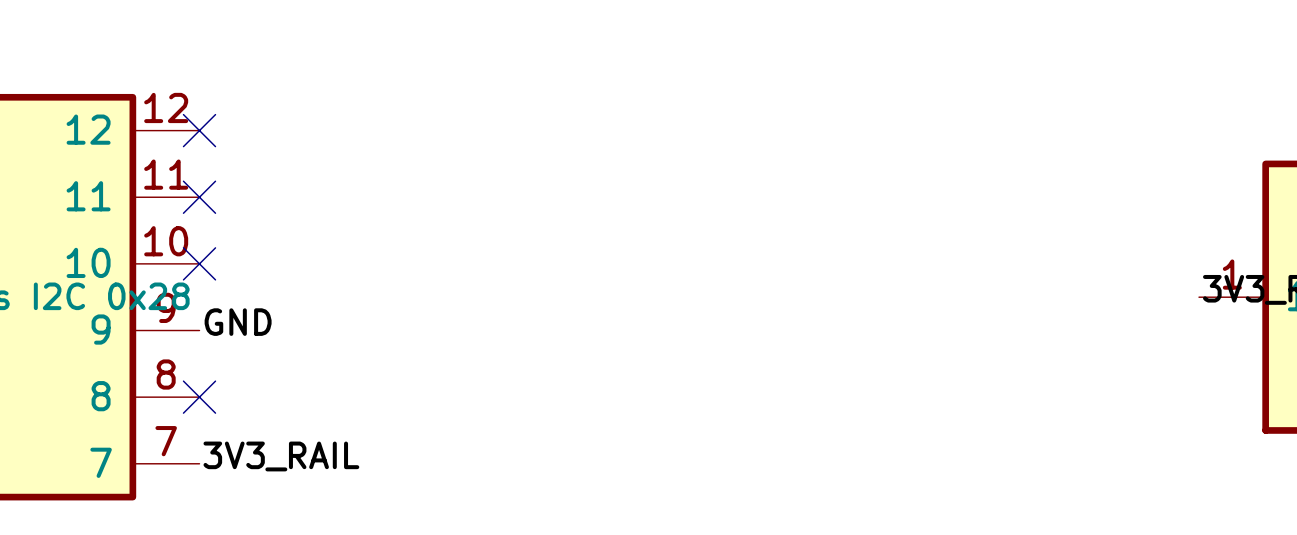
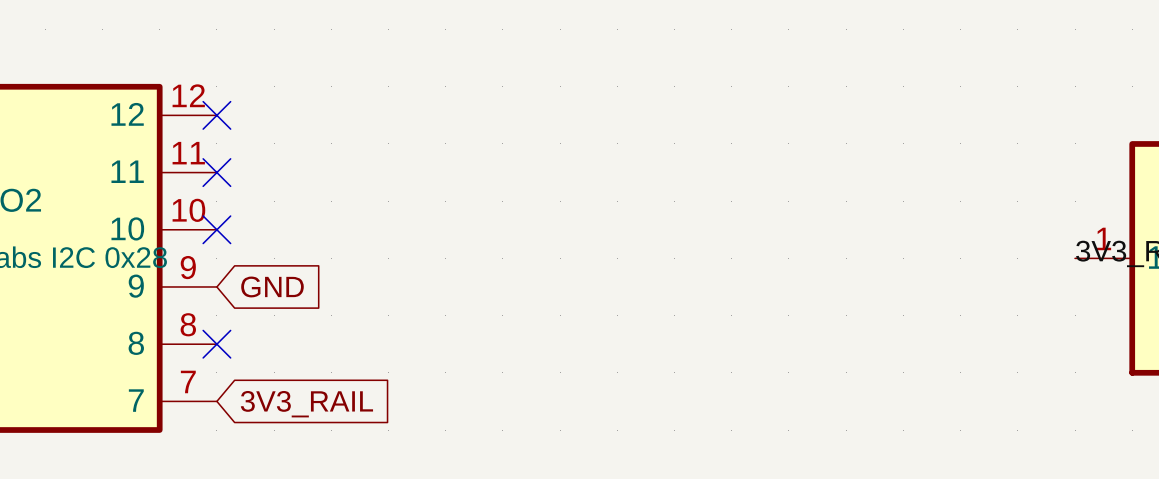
label: GND (238, 322) -> none
global label: none -> GND (272, 286)
label: 3V3_RAIL (281, 456) -> none
global label: none -> 3V3_RAIL (306, 404)

